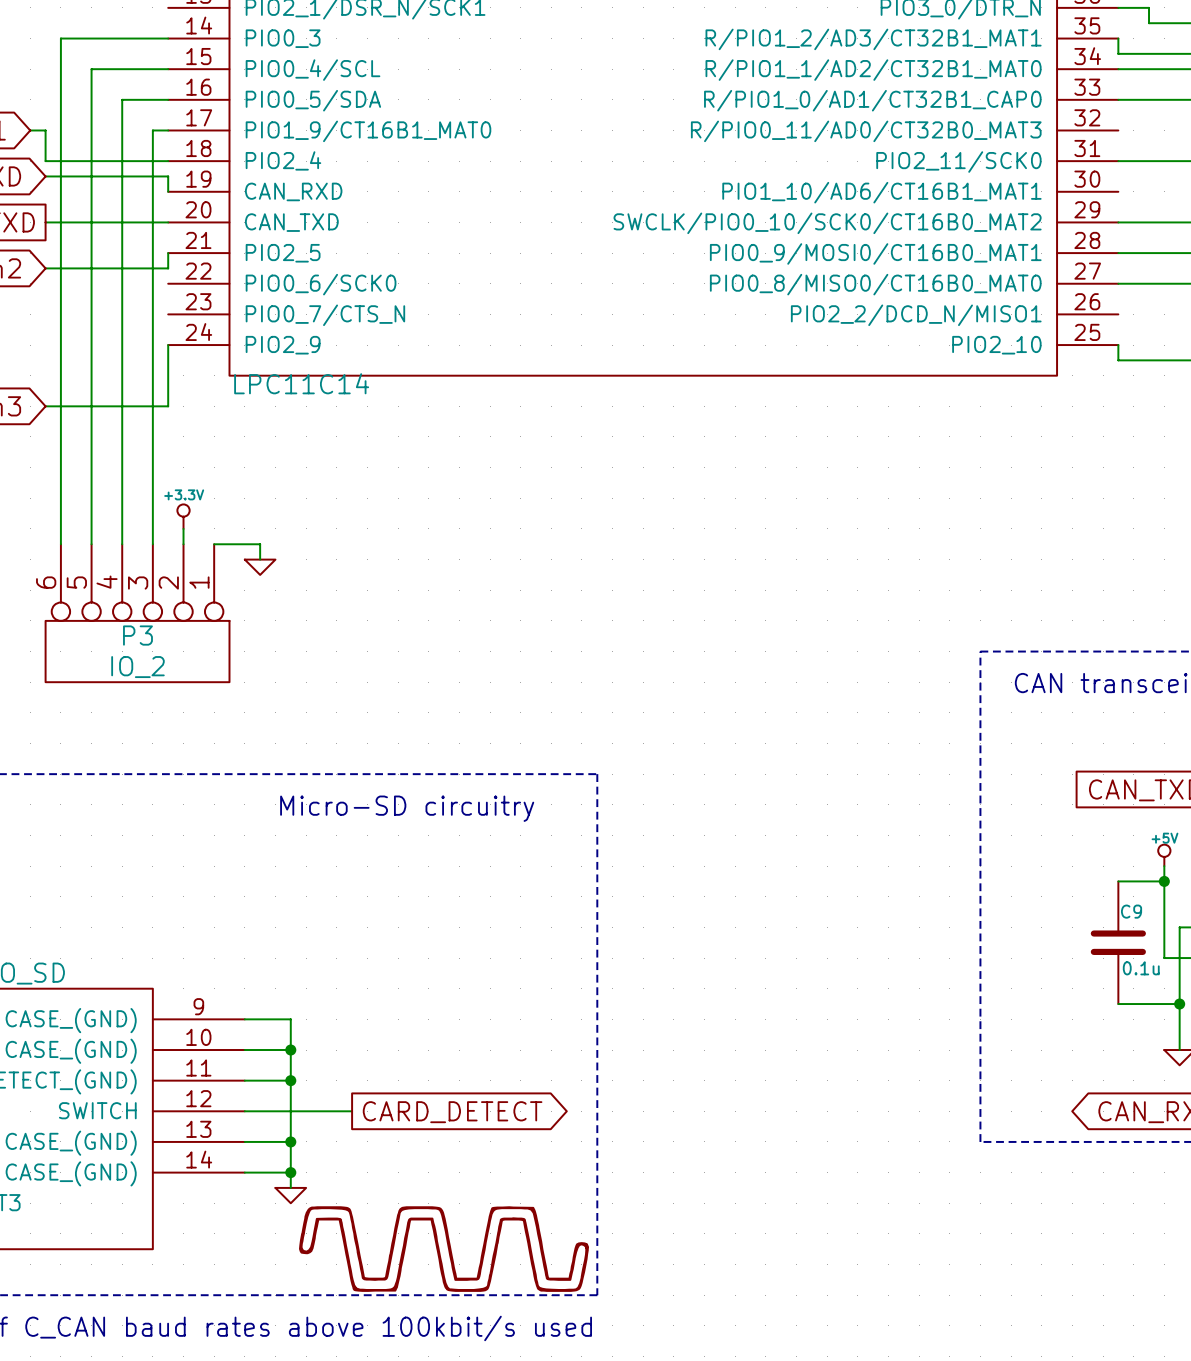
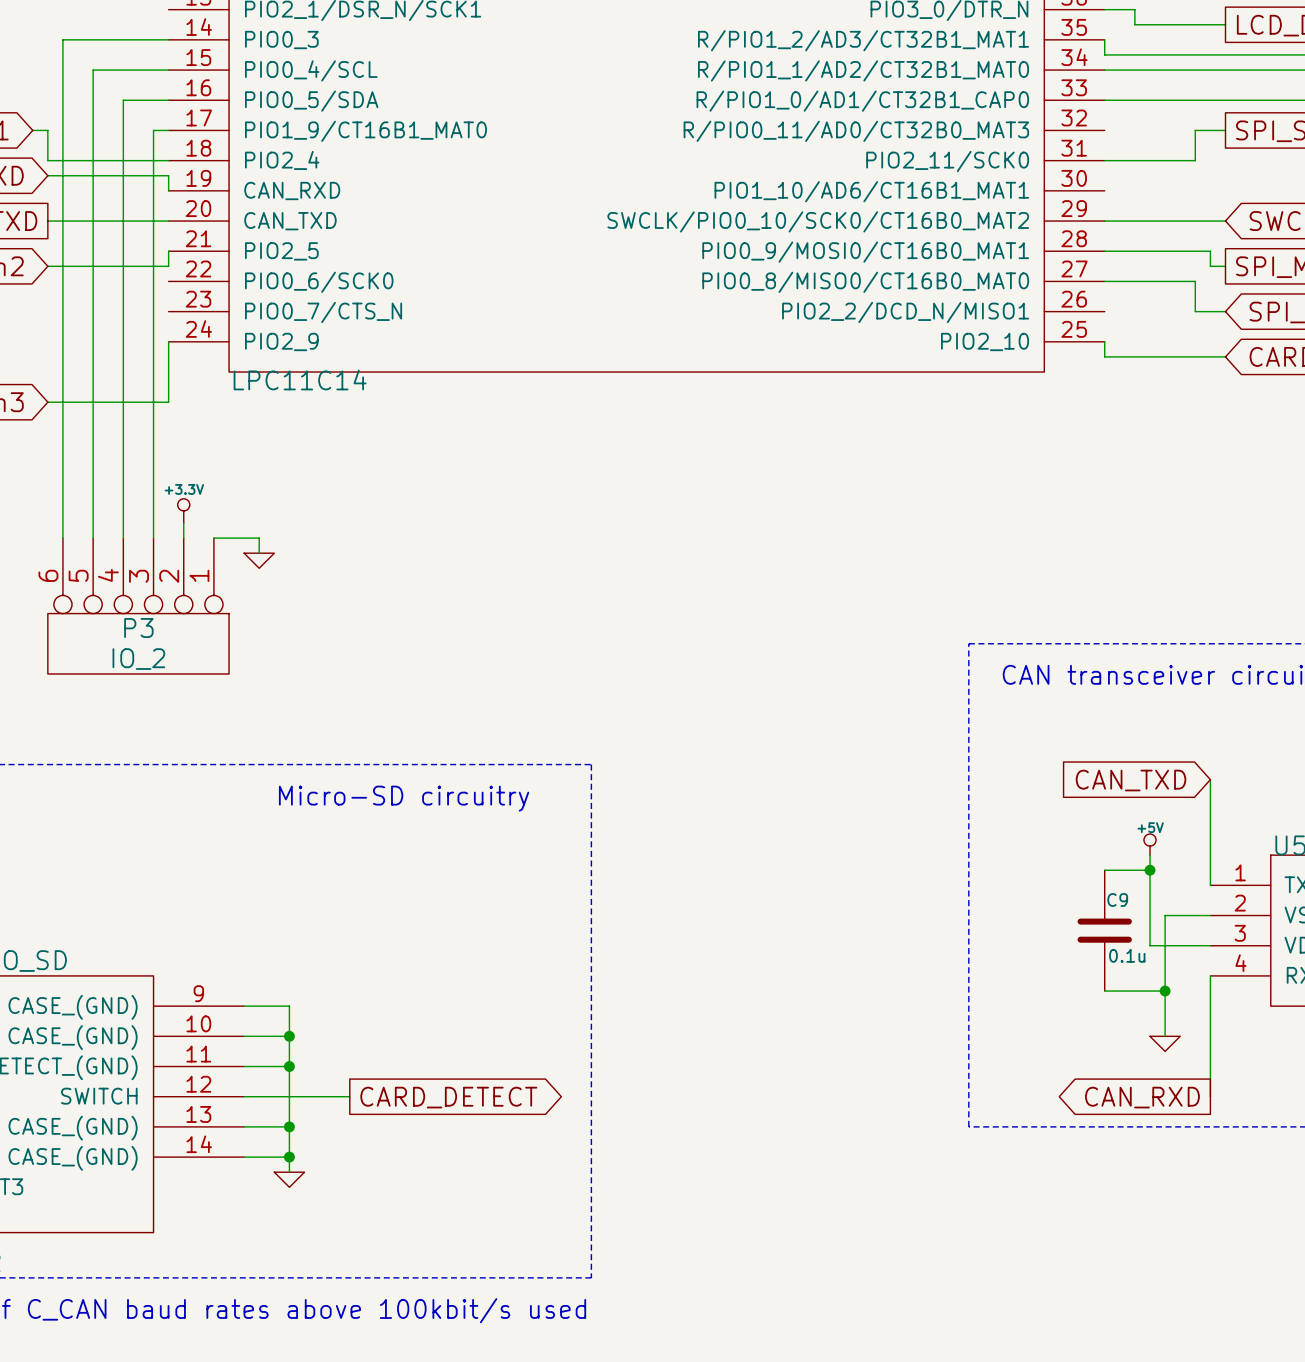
power symbol: (443, 1249) -> none

